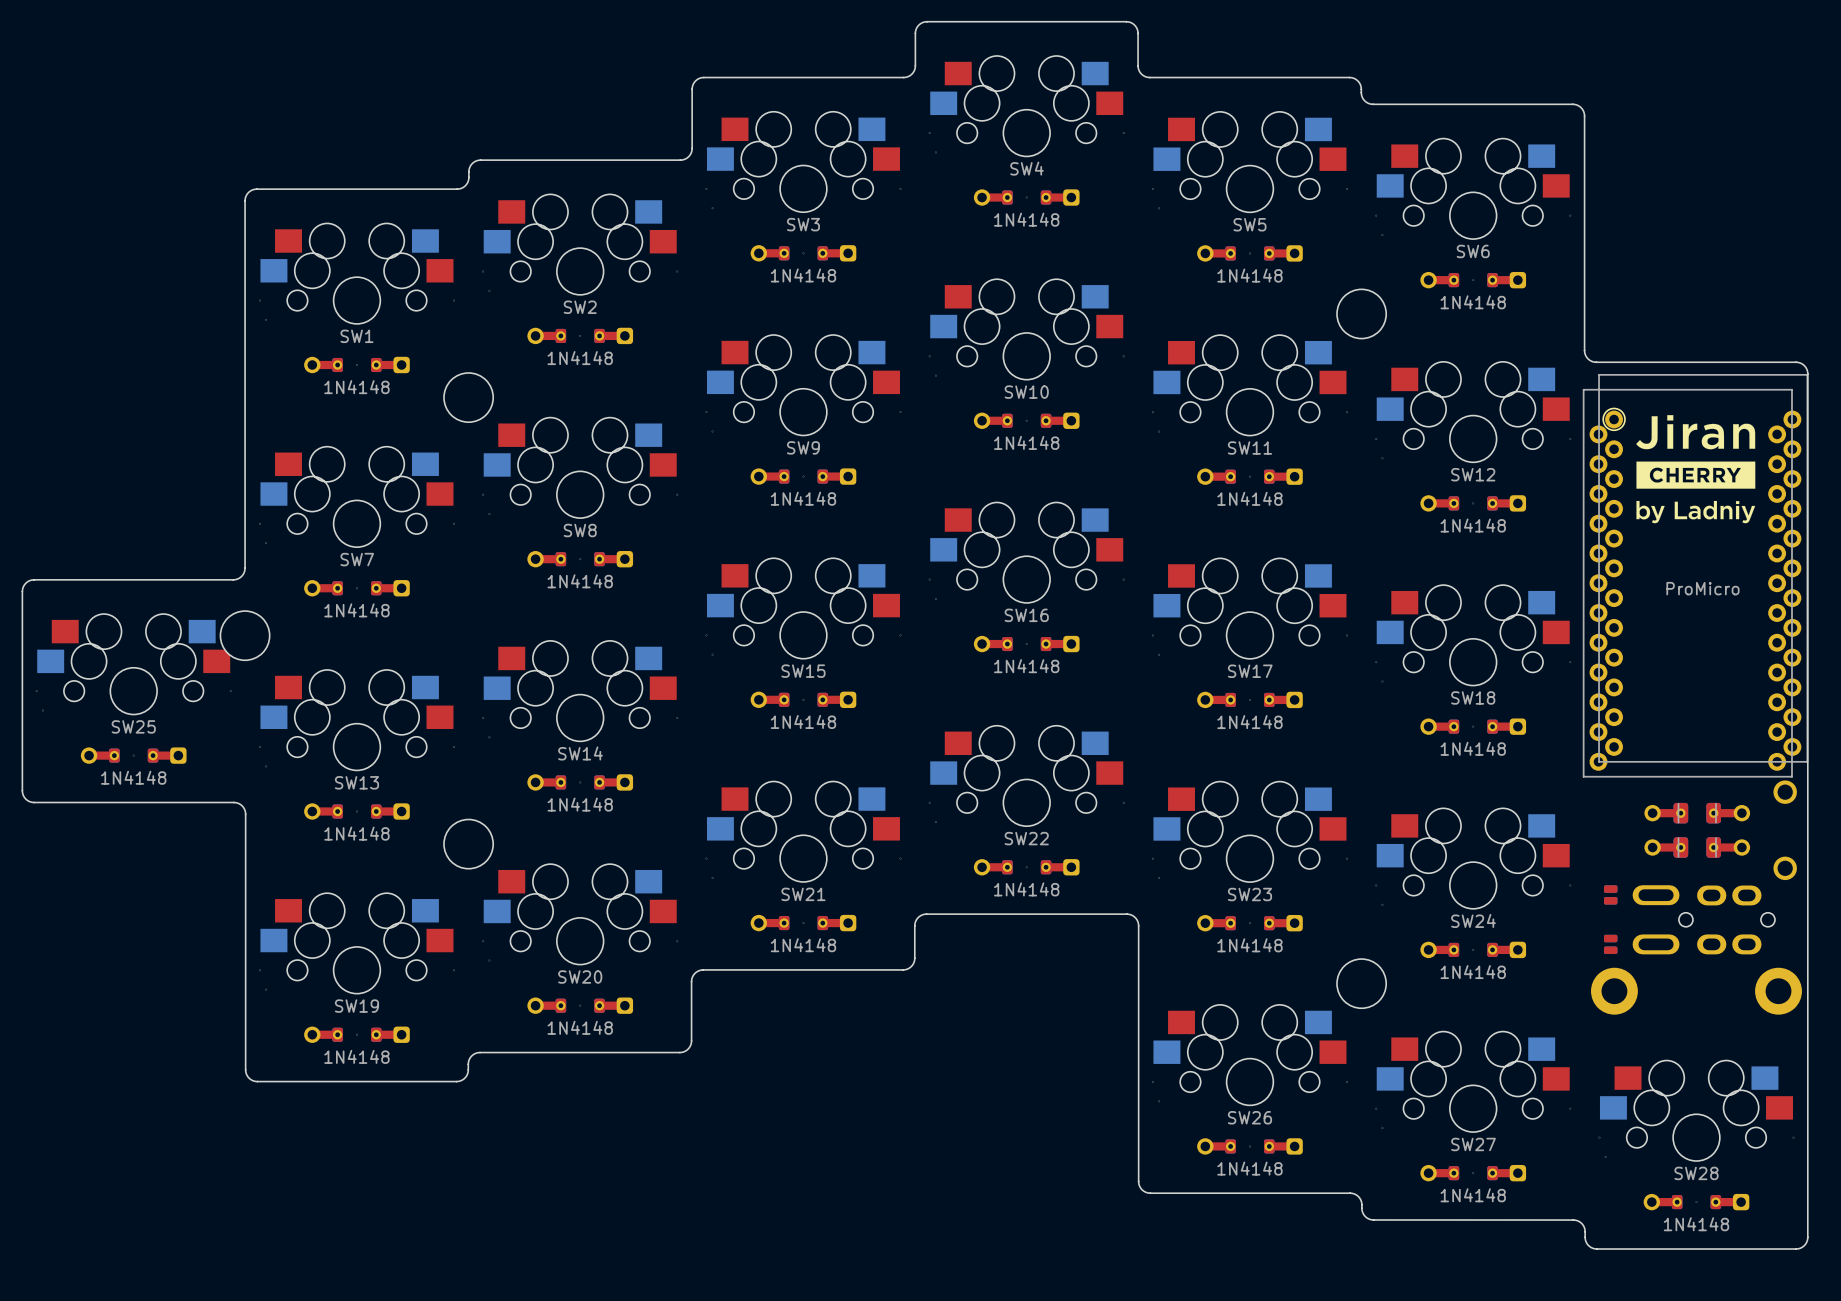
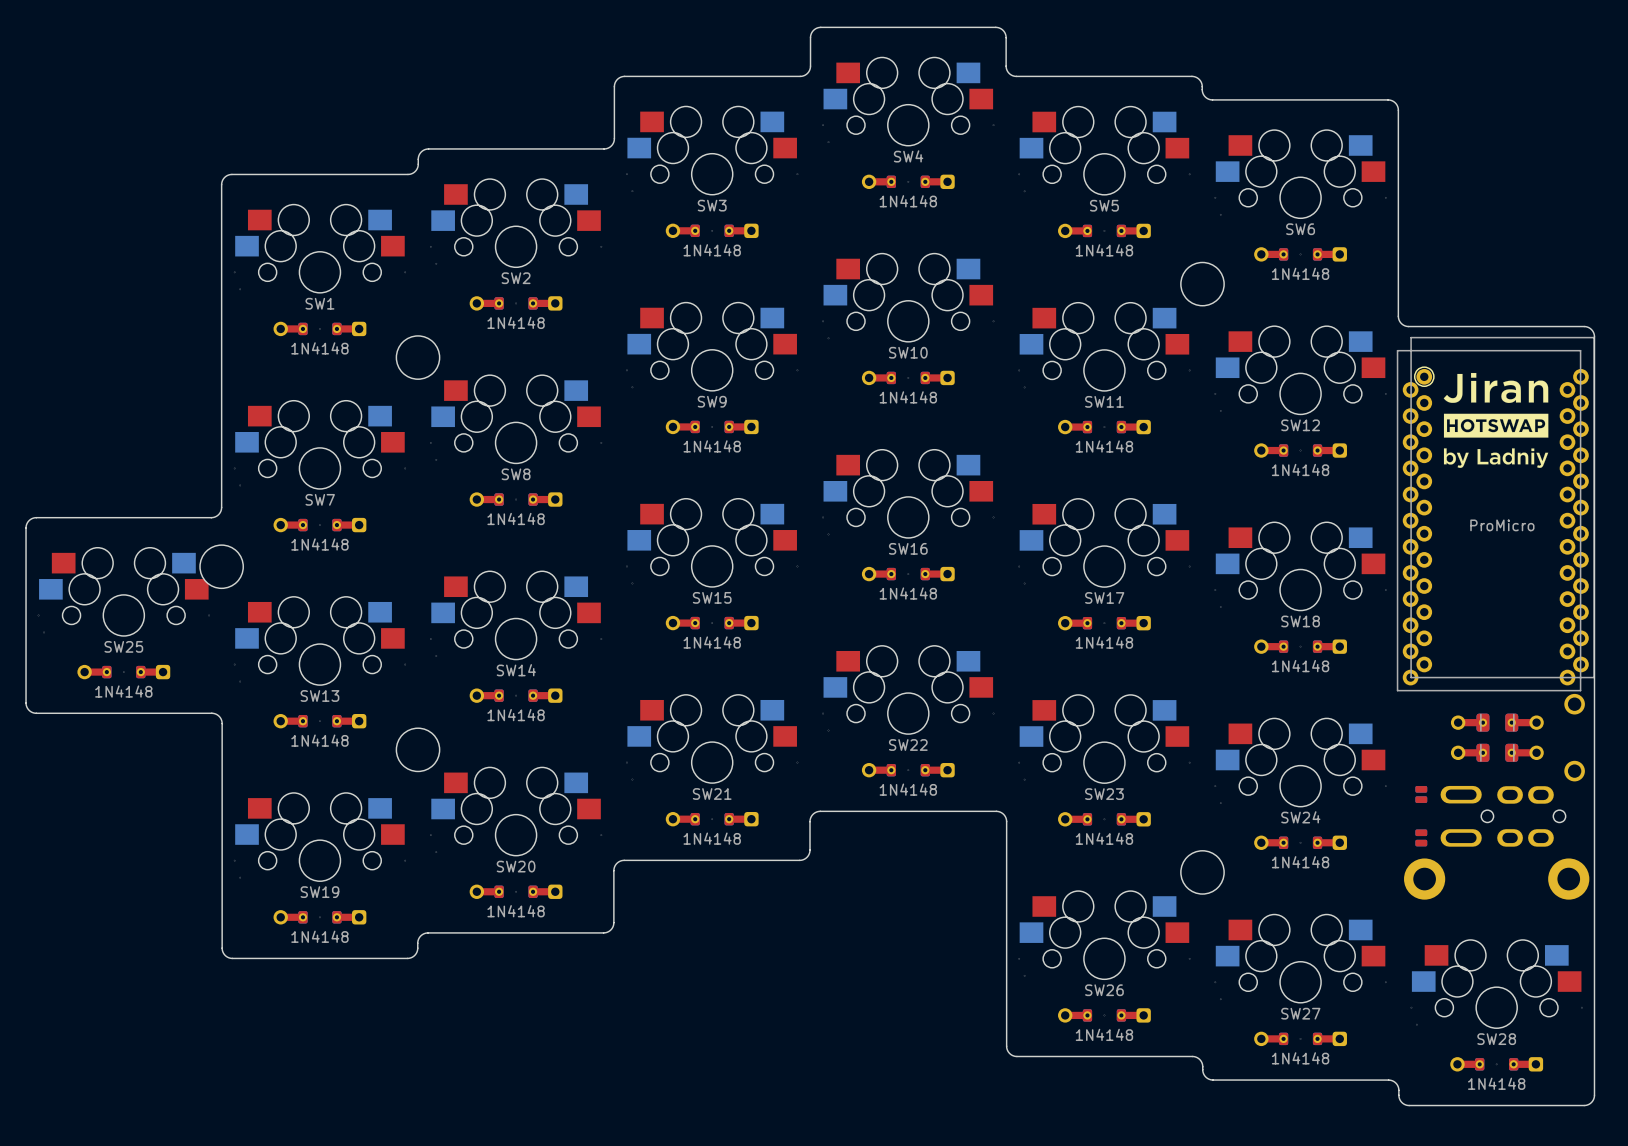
drawing shape: [1636, 415, 1756, 524] -> [1443, 372, 1549, 468]

